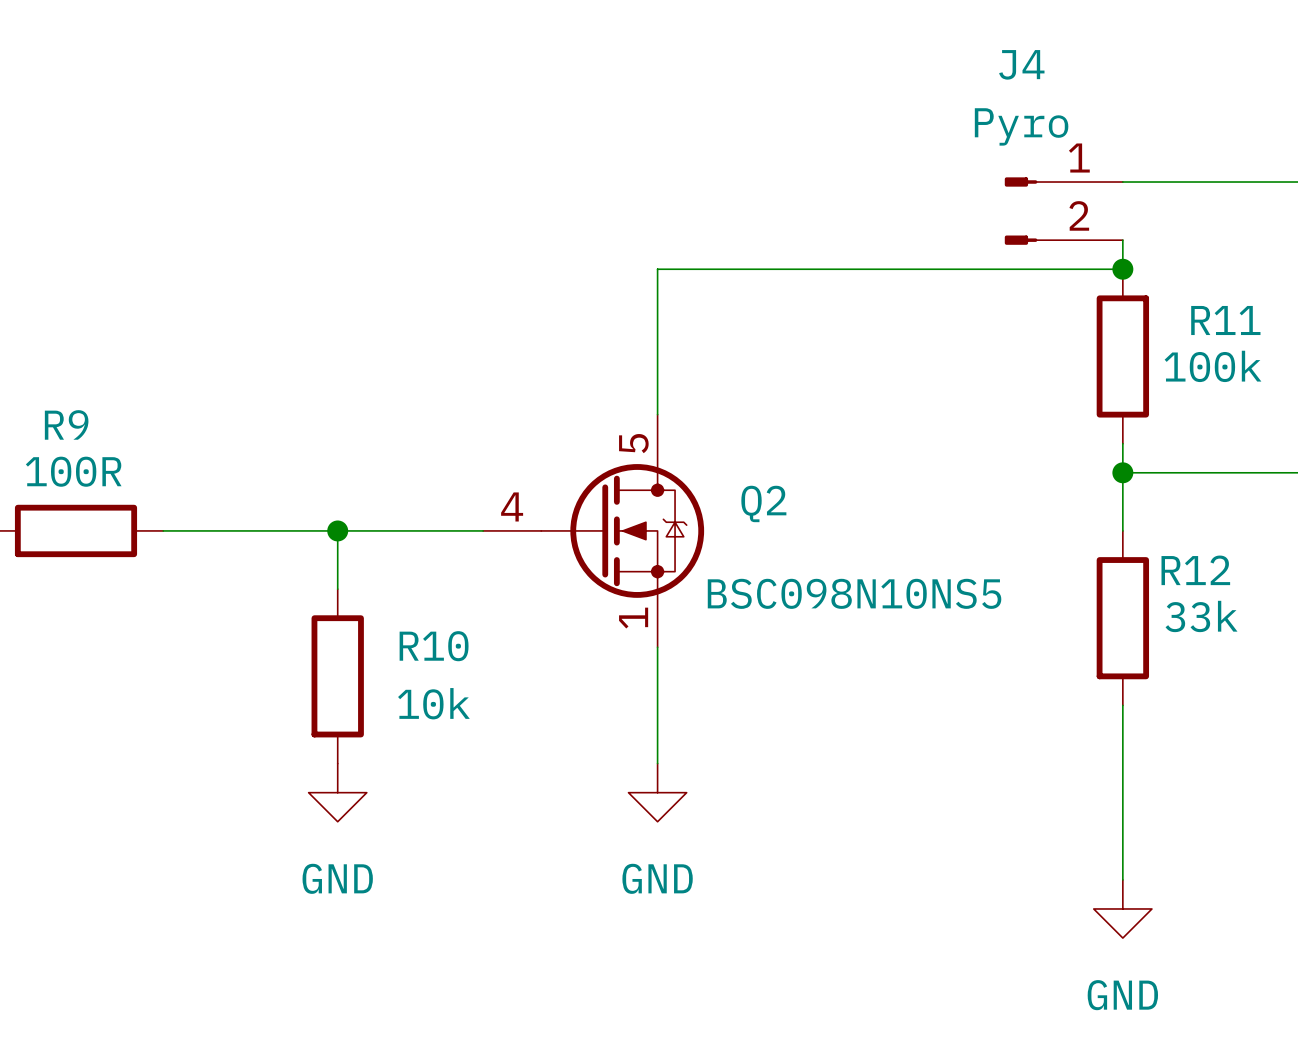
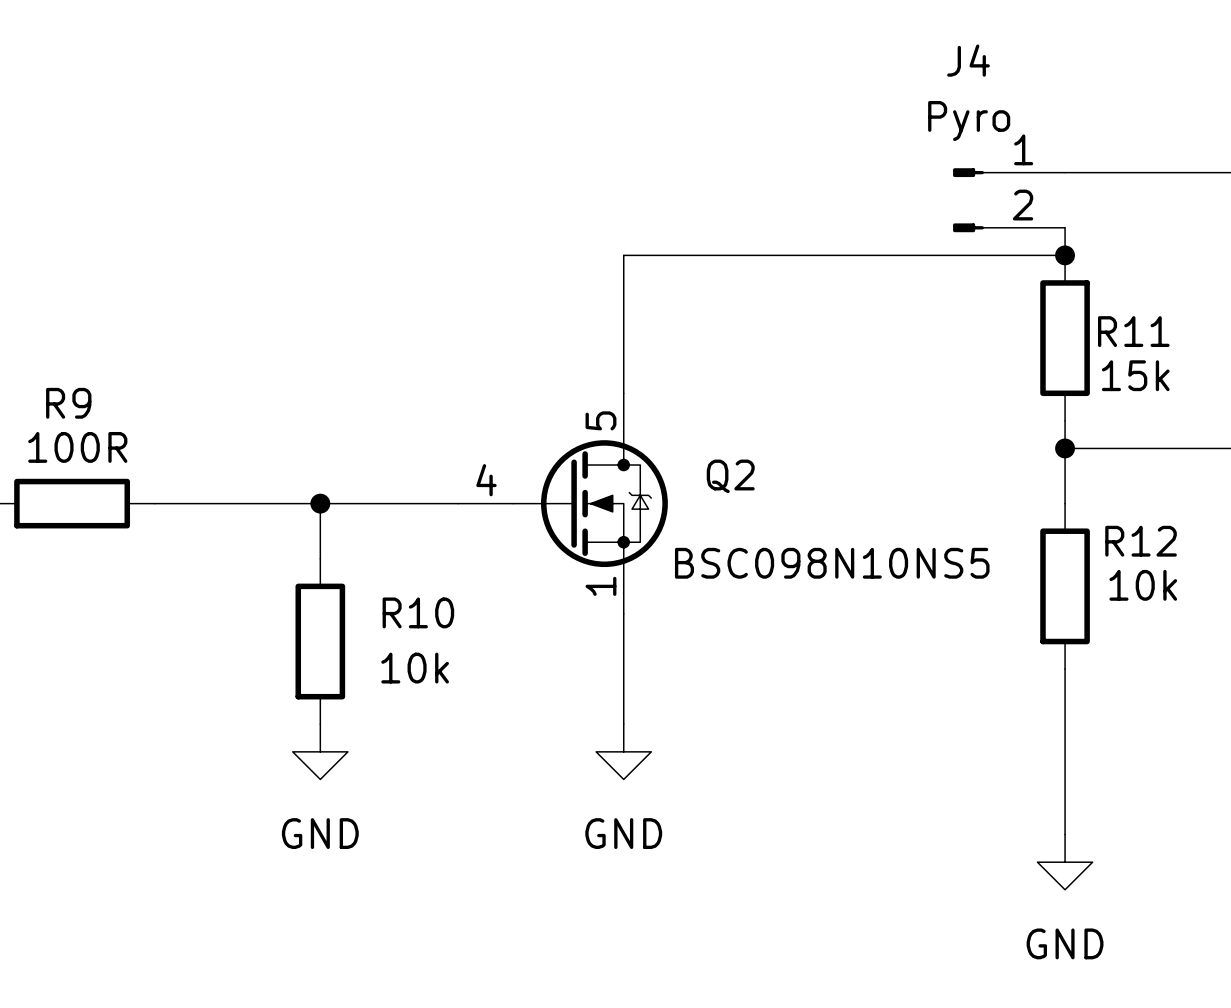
R11 name position: R11 (1225, 320) -> R11 (1133, 331)
R11 value: 100k (1213, 366) -> 15k (1135, 375)
R12 value: 33k (1201, 616) -> 10k (1143, 585)

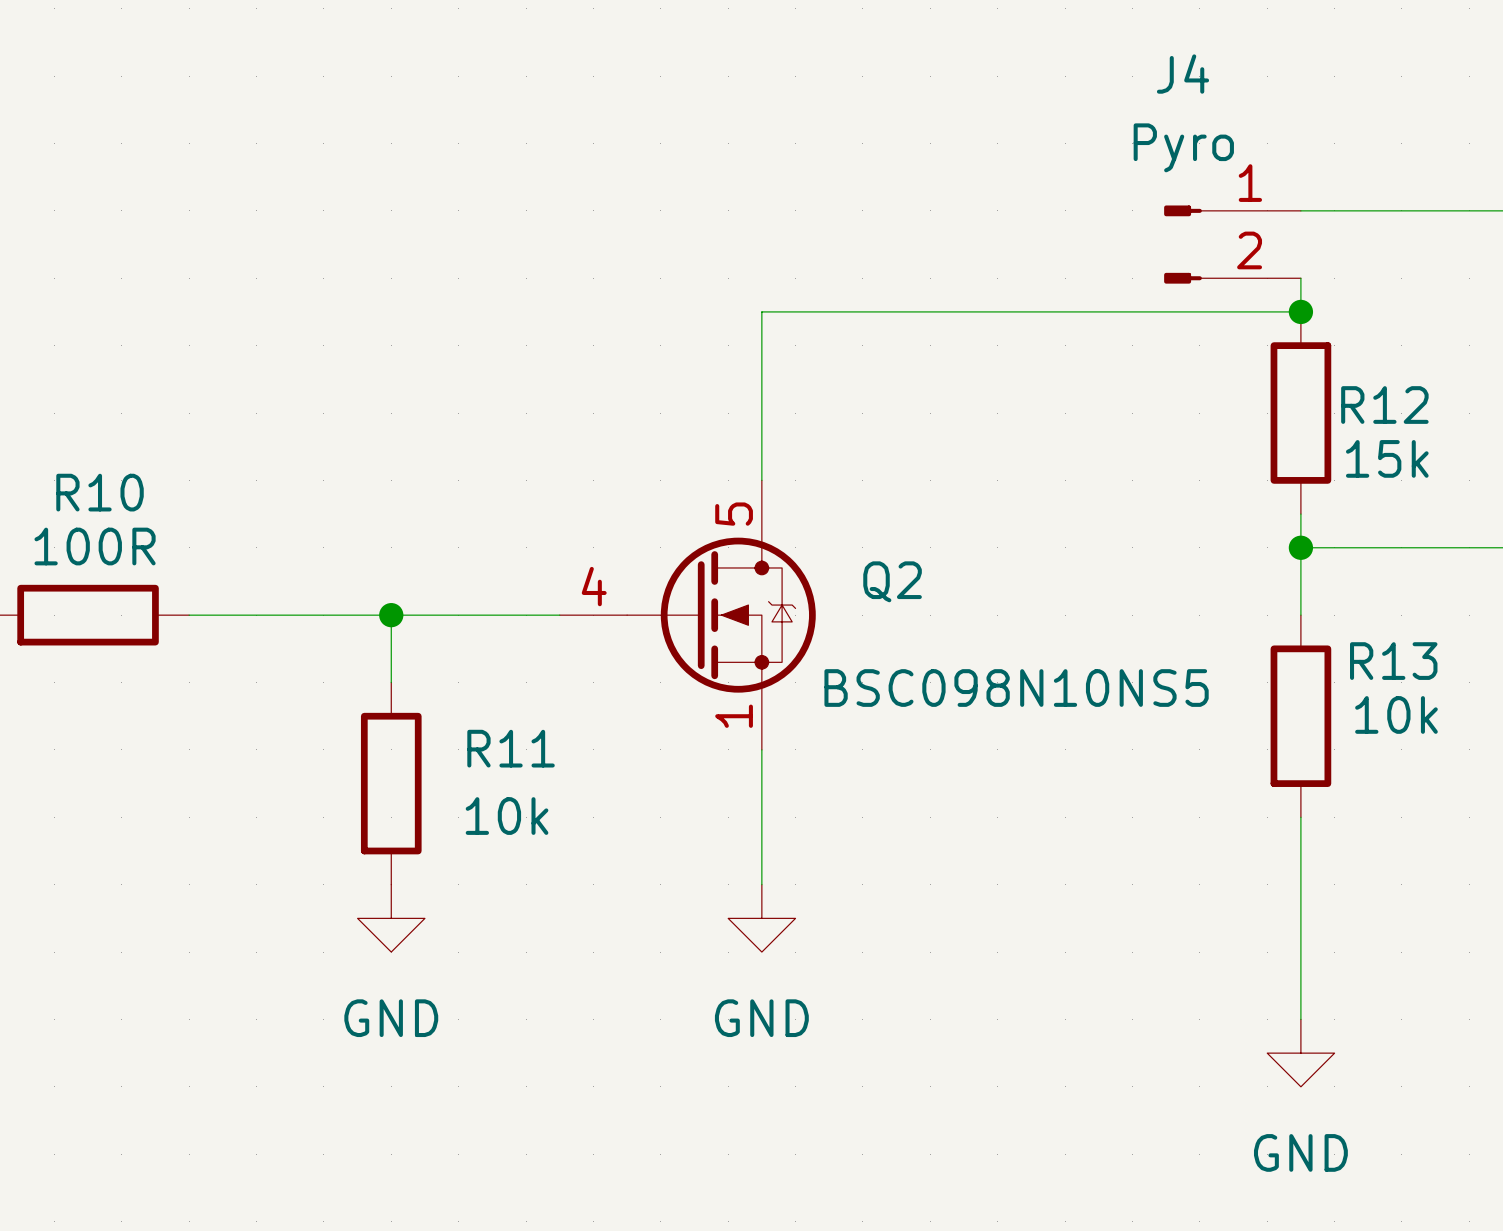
R11 name: R11 (1133, 331) -> R12 (1384, 405)
R9 name: R9 (68, 403) -> R10 (100, 492)
R12 name: R12 (1141, 541) -> R13 (1393, 661)
R10 name: R10 (418, 612) -> R11 (511, 748)

